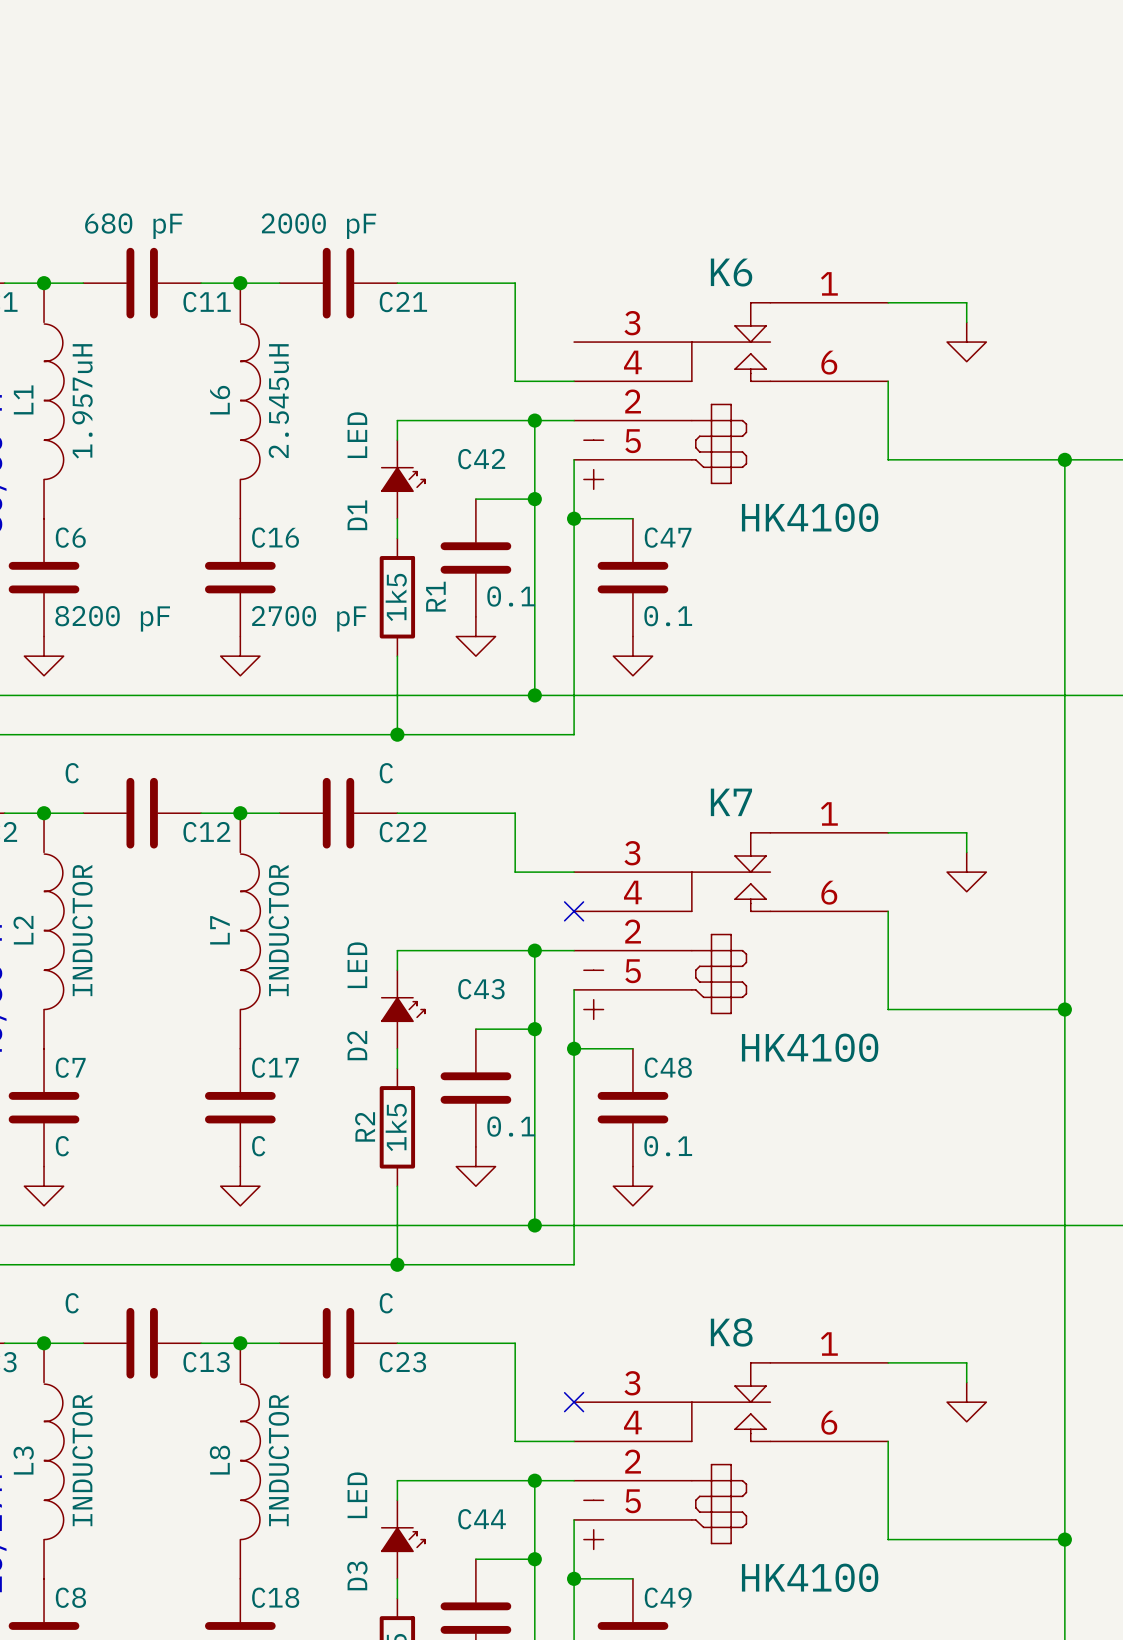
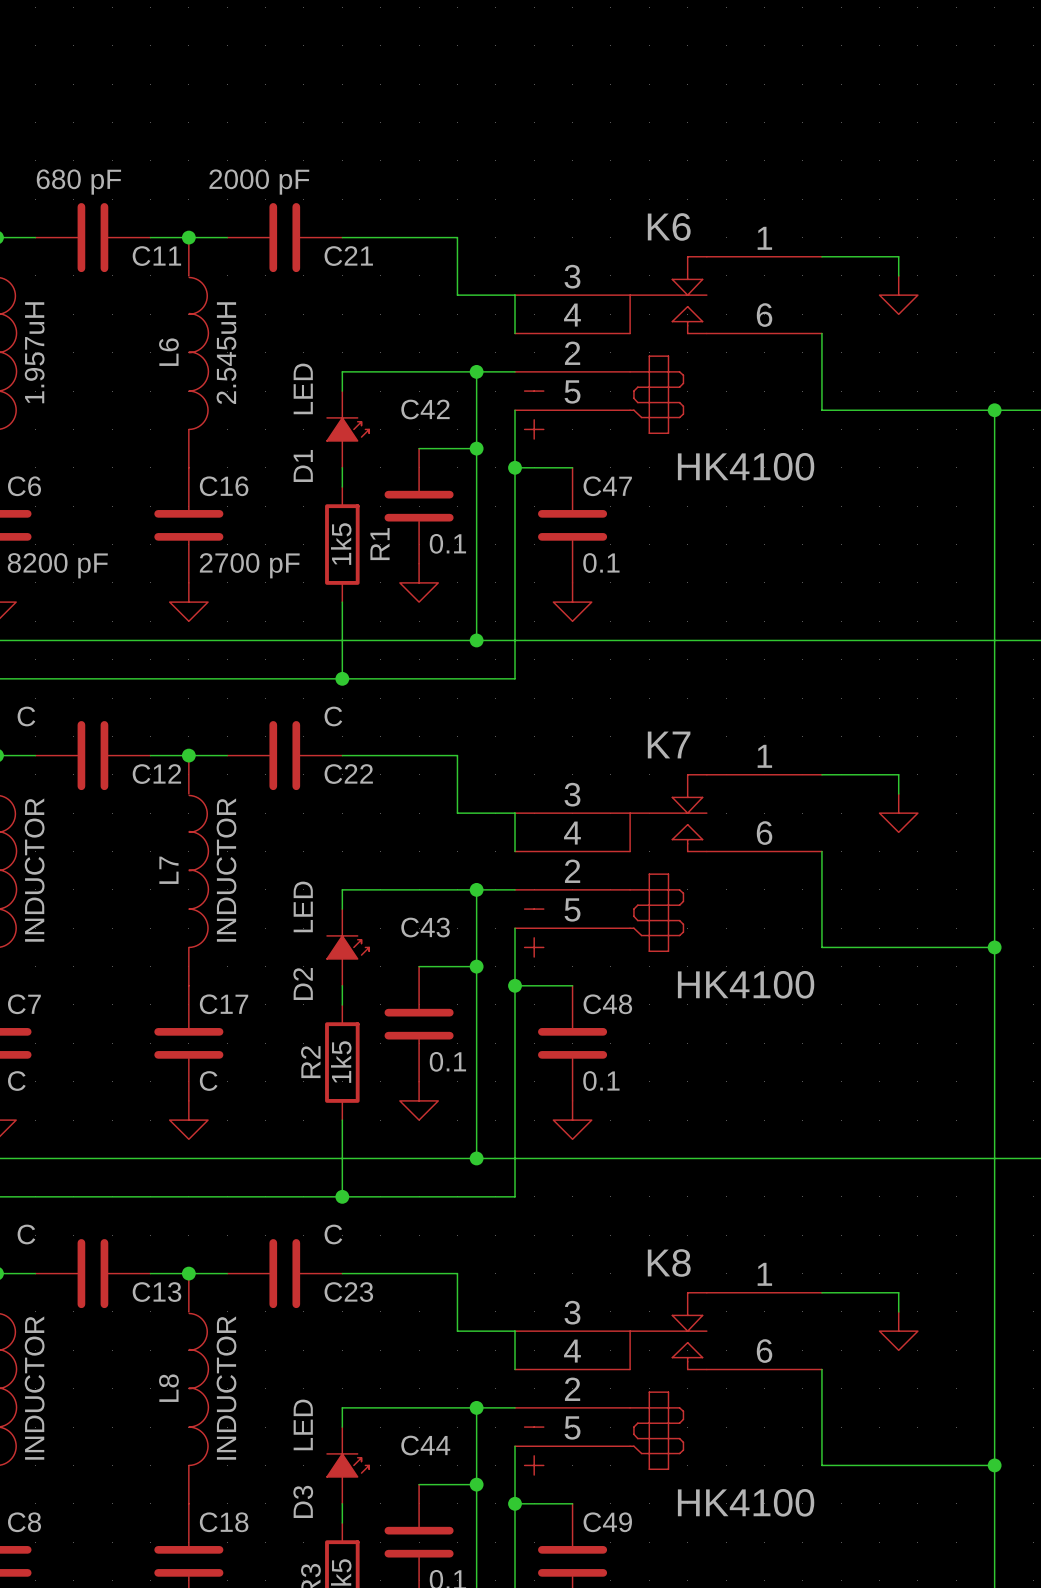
wire: (515, 342) (515, 381) (574, 381) -> (457, 295) (515, 295) (515, 333)
wire: none -> (515, 813) (515, 851)
no-connect mark: (574, 911) -> none
wire: (515, 1402) (515, 1441) (574, 1441) -> (457, 1331) (515, 1331) (515, 1369)
no-connect mark: (574, 1402) -> none

